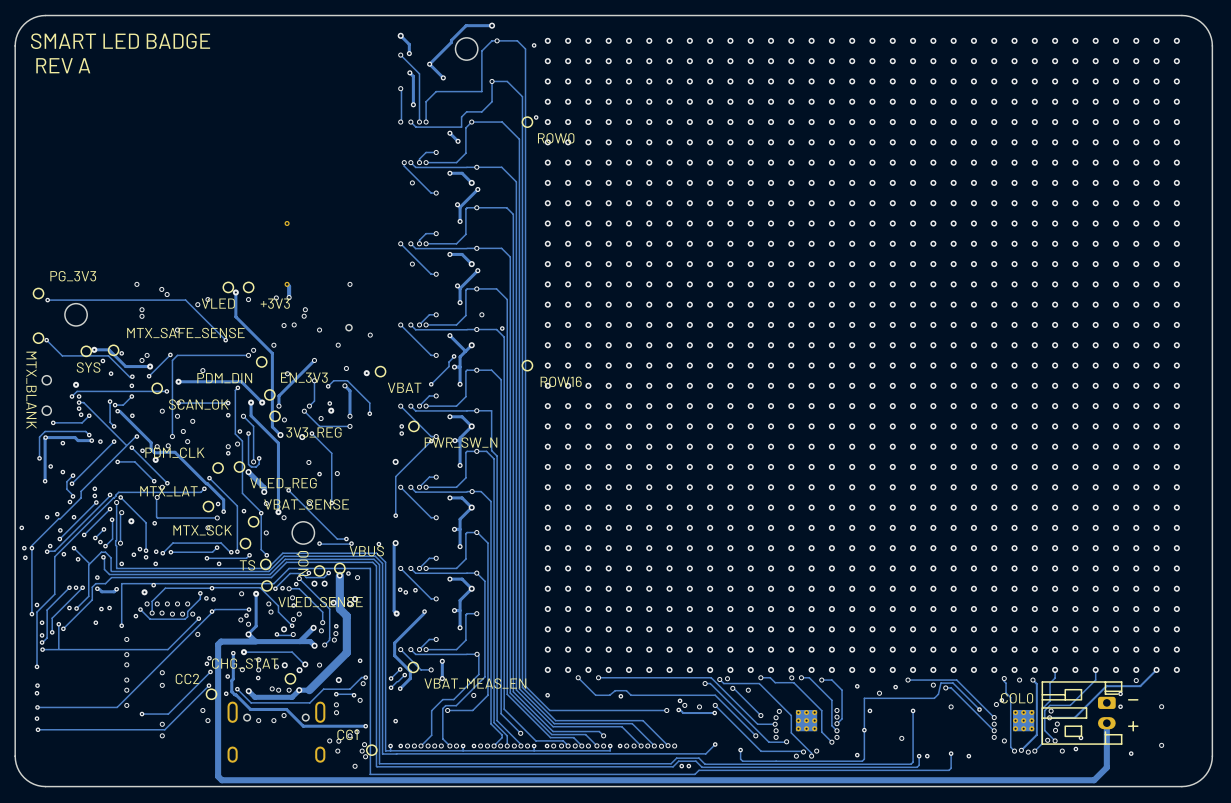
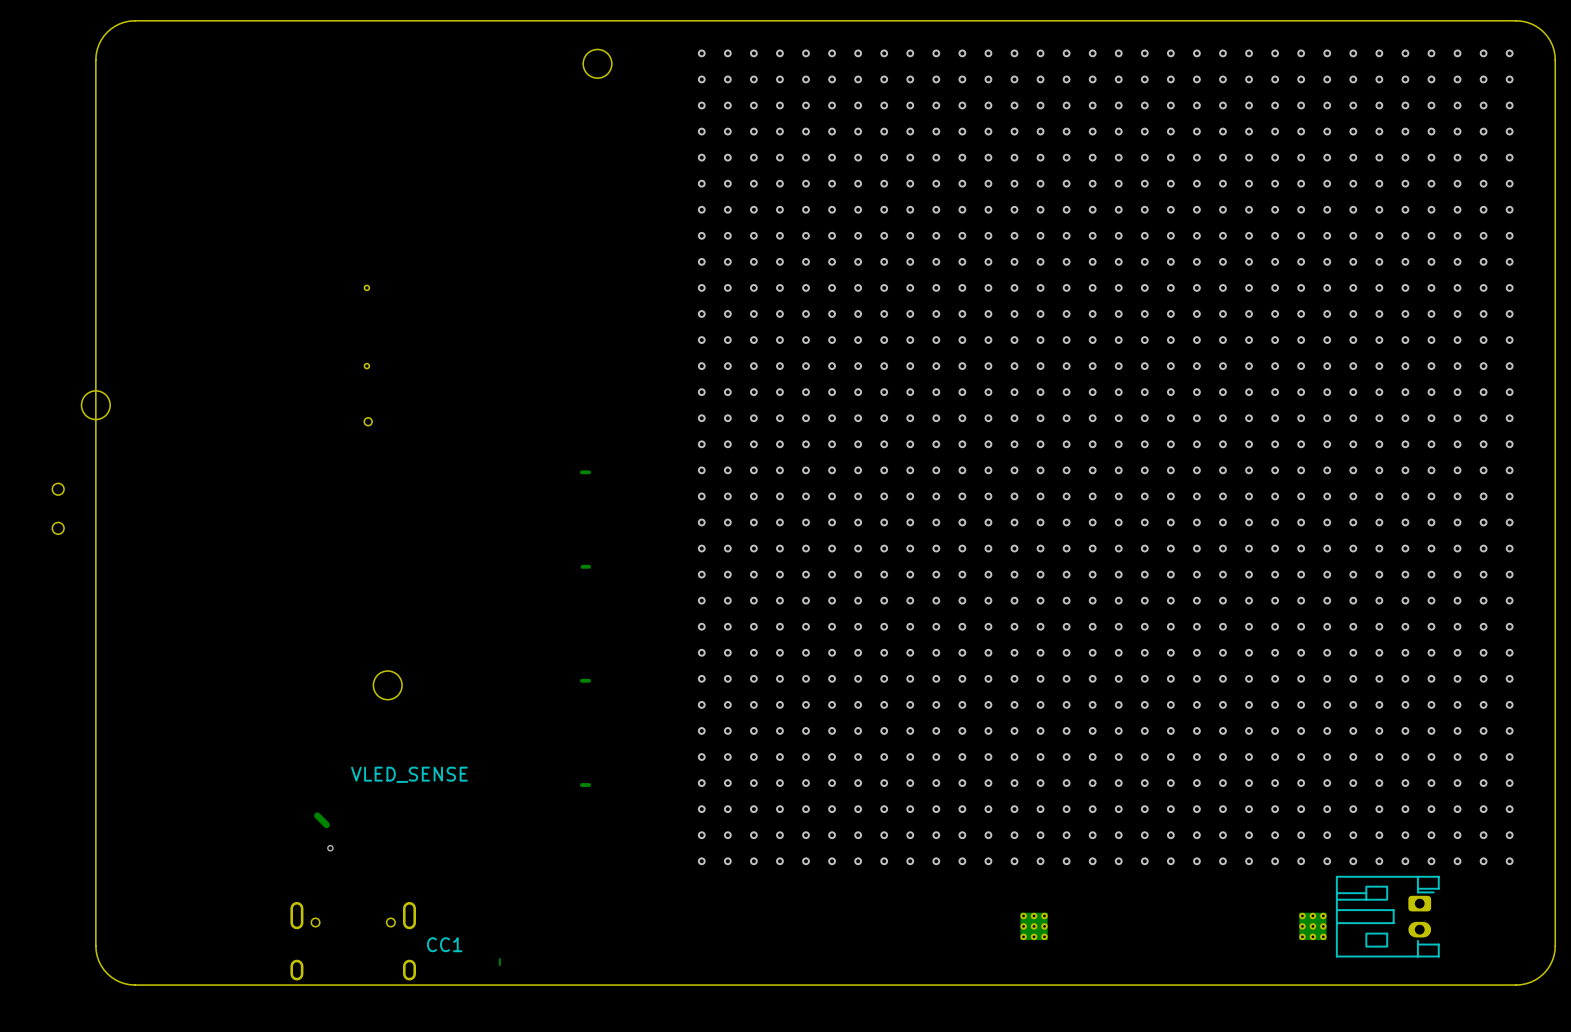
board edge: (106, 15) (37, 16) (30, 19) (21, 27) (15, 41) (15, 756) (19, 771) (30, 782) (45, 786) (1181, 786) (1197, 782) (1208, 771) (1212, 760) (1212, 735) -> (134, 20) (119, 23) (107, 32) (98, 44) (95, 59) (95, 945) (101, 965) (115, 979) (134, 985) (1516, 985) (1531, 982) (1543, 973) (1552, 960) (1555, 945)
track: (492, 25) (466, 25) (451, 40) (429, 64) (443, 77) -> none
via: (492, 25) -> none
track: (400, 35) (409, 44) (409, 53) -> none
via: (400, 35) -> none
via: (497, 40) -> none
text: SMART LED BADGE (120, 41) -> none
via: (534, 45) -> none
via: (409, 53) -> none
track: (400, 55) (419, 73) (419, 122) -> none
via: (400, 55) -> none
via: (429, 64) -> none
text: REV A (63, 65) -> none
track: (409, 72) (413, 76) (413, 104) -> none
via: (409, 72) -> none
via: (443, 77) -> none
via: (492, 81) -> none
via: (400, 88) -> none
track: (401, 89) (401, 121) -> none
via: (413, 104) -> none
drawing: [521, 116, 534, 128] -> none
via: (536, 117) -> none
via: (400, 122) -> none
track: (410, 122) (415, 127) (461, 127) (461, 116) (466, 111) (481, 111) (492, 101) (492, 81) (507, 81) (522, 96) (522, 687) (555, 720) (642, 720) (668, 745) -> none
via: (410, 122) -> none
via: (419, 122) -> none
track: (426, 122) (426, 101) (436, 91) (481, 91) (481, 51) (492, 40) (517, 40) (525, 48) (525, 686) (549, 710) (666, 710) -> none
via: (426, 122) -> none
via: (471, 122) -> none
track: (449, 133) (458, 141) -> none
via: (449, 133) -> none
text: ROW0 (556, 138) -> none
via: (458, 141) -> none
track: (436, 152) (426, 152) (419, 159) (419, 162) -> none
via: (436, 152) -> none
track: (404, 162) (404, 166) (431, 193) (436, 193) -> none
via: (404, 162) -> none
track: (410, 162) (415, 167) (466, 167) -> none
via: (410, 162) -> none
via: (419, 162) -> none
track: (426, 162) (456, 162) (465, 153) (465, 127) (471, 122) (502, 122) (519, 139) (519, 688) (554, 723) (632, 723) (654, 745) -> none
via: (426, 162) -> none
track: (467, 167) (501, 167) (516, 181) (516, 689) (553, 726) (621, 726) (641, 746) -> none
via: (476, 167) -> none
track: (449, 173) (462, 173) (471, 182) -> none
via: (449, 173) -> none
via: (412, 182) -> none
via: (471, 182) -> none
track: (477, 189) (460, 207) -> none
via: (477, 189) -> none
via: (436, 193) -> none
via: (457, 204) -> none
track: (460, 207) (460, 221) -> none
via: (476, 207) -> none
via: (460, 221) -> none
track: (436, 233) (426, 233) (419, 240) (419, 243) -> none
via: (436, 233) -> none
track: (400, 243) (431, 274) (436, 274) -> none
via: (400, 243) -> none
track: (410, 243) (415, 248) (466, 248) -> none
via: (410, 243) -> none
via: (419, 243) -> none
track: (426, 243) (456, 243) (465, 234) (467, 207) (506, 207) (513, 214) (513, 691) (553, 731) (599, 731) (603, 735) -> none
via: (426, 243) -> none
track: (467, 248) (501, 248) (510, 256) (510, 693) (551, 734) (585, 734) (596, 745) -> none
via: (476, 248) -> none
track: (449, 254) (462, 254) (471, 264) -> none
via: (449, 254) -> none
via: (412, 264) -> none
via: (471, 264) -> none
track: (477, 270) (460, 288) -> none
via: (477, 270) -> none
via: (436, 274) -> none
text: PG_3V3 (73, 276) -> none
drawing: [222, 281, 255, 294] -> none
via: (136, 284) -> none
track: (287, 284) (289, 286) (289, 297) -> none
via: (349, 284) -> none
via: (457, 285) -> none
drawing: [32, 287, 45, 300] -> none
track: (460, 288) (460, 302) -> none
via: (476, 288) -> none
via: (161, 289) -> none
track: (235, 292) (235, 316) (272, 353) (272, 426) (278, 433) -> none
via: (235, 292) -> none
via: (167, 294) -> none
via: (276, 297) -> none
via: (289, 297) -> none
via: (207, 299) -> none
via: (248, 299) -> none
track: (47, 300) (185, 300) (225, 340) -> none
via: (47, 300) -> none
via: (460, 302) -> none
text: VLED (218, 303) -> none
text: +3V3 (275, 303) -> none
via: (197, 304) -> none
via: (142, 309) -> none
via: (305, 309) -> none
track: (436, 314) (429, 314) (419, 324) -> none
via: (436, 314) -> none
via: (481, 314) -> none
via: (142, 316) -> none
via: (304, 316) -> none
via: (294, 324) -> none
track: (400, 324) (431, 355) (436, 355) -> none
via: (400, 324) -> none
track: (410, 324) (415, 329) (466, 329) -> none
via: (410, 324) -> none
via: (419, 324) -> none
track: (426, 324) (456, 324) (465, 315) (467, 288) (496, 288) (507, 299) (507, 694) (550, 737) (573, 737) (581, 745) -> none
via: (426, 324) -> none
via: (284, 325) -> none
part position: (348, 327) -> (368, 421)
via: (502, 328) -> none
track: (467, 329) (496, 329) (504, 337) (504, 709) (535, 740) (563, 740) (566, 744) -> none
via: (476, 329) -> none
via: (177, 330) -> none
via: (319, 330) -> none
drawing: [32, 332, 45, 344] -> none
text: MTX_SAFE_SENSE (185, 333) -> none
via: (370, 335) -> none
track: (449, 335) (465, 351) -> none
via: (449, 335) -> none
track: (46, 340) (62, 355) (108, 355) (130, 377) -> none
via: (46, 340) -> none
via: (225, 340) -> none
drawing: [107, 344, 120, 357] -> none
drawing: [80, 345, 93, 358] -> none
via: (273, 345) -> none
via: (338, 345) -> none
track: (471, 345) (460, 356) (460, 384) -> none
via: (471, 345) -> none
track: (94, 349) (109, 349) (125, 366) (150, 366) -> none
via: (94, 349) -> none
via: (253, 350) -> none
via: (121, 353) -> none
track: (170, 354) (149, 376) -> none
via: (170, 354) -> none
via: (147, 355) -> none
track: (248, 355) (177, 355) (172, 360) (172, 436) -> none
via: (248, 355) -> none
via: (436, 355) -> none
drawing: [255, 356, 268, 368] -> none
track: (454, 356) (449, 361) (449, 366) (431, 384) -> none
via: (454, 356) -> none
drawing: [521, 359, 534, 372] -> none
via: (102, 360) -> none
via: (142, 360) -> none
track: (314, 360) (278, 395) (278, 406) -> none
via: (314, 360) -> none
drawing: [374, 365, 387, 378] -> none
via: (150, 366) -> none
text: SYS (88, 367) -> none
via: (454, 367) -> none
via: (346, 368) -> none
via: (202, 370) -> none
via: (476, 370) -> none
via: (111, 373) -> none
via: (287, 373) -> none
via: (366, 373) -> none
via: (132, 376) -> none
via: (149, 376) -> none
text: EN_3V3 (304, 377) -> none
text: PDM_DIN (224, 378) -> none
track: (314, 380) (314, 401) (309, 406) -> none
via: (314, 380) -> none
track: (178, 381) (241, 381) (262, 402) -> none
via: (178, 381) -> none
text: ROW16 (561, 381) -> none
drawing: [151, 382, 164, 395] -> none
via: (76, 384) -> none
via: (431, 384) -> none
via: (460, 384) -> none
via: (131, 385) -> none
track: (344, 385) (349, 390) (349, 416) -> none
via: (344, 385) -> none
track: (328, 386) (333, 380) (347, 380) (369, 403) (369, 413) -> none
via: (328, 386) -> none
track: (237, 387) (235, 390) (235, 434) (242, 441) (242, 493) (260, 511) -> none
via: (237, 387) -> none
text: VBAT (404, 387) -> none
drawing: [264, 389, 281, 423] -> none
text: MTX_BLANK (31, 390) -> none
track: (166, 391) (77, 391) (72, 396) -> none
via: (166, 391) -> none
track: (436, 395) (429, 395) (419, 405) -> none
via: (436, 395) -> none
via: (72, 396) -> none
via: (79, 396) -> none
track: (131, 396) (123, 405) (115, 405) -> none
via: (131, 396) -> none
track: (110, 401) (110, 422) (114, 426) -> none
via: (110, 401) -> none
track: (79, 402) (83, 402) (126, 445) -> none
via: (79, 402) -> none
track: (251, 402) (251, 415) (278, 443) (278, 512) -> none
via: (251, 402) -> none
via: (262, 402) -> none
via: (178, 403) -> none
track: (228, 403) (178, 403) -> none
via: (228, 403) -> none
via: (329, 403) -> none
text: SCAN_OK (198, 404) -> none
via: (115, 405) -> none
via: (278, 406) -> none
via: (309, 406) -> none
track: (400, 406) (431, 436) (436, 436) -> none
via: (400, 406) -> none
track: (410, 406) (415, 410) (466, 410) -> none
via: (410, 406) -> none
via: (419, 406) -> none
track: (426, 406) (456, 406) (465, 396) (467, 370) (491, 370) (501, 379) (501, 713) (520, 733) -> none
via: (426, 406) -> none
via: (79, 408) -> none
via: (331, 410) -> none
track: (467, 410) (491, 410) (491, 450) (497, 456) (497, 720) (520, 746) -> none
via: (476, 410) -> none
via: (117, 411) -> none
track: (119, 411) (151, 442) (151, 449) (154, 452) (174, 452) (223, 499) (223, 511) -> none
via: (162, 411) -> none
track: (304, 411) (319, 426) (349, 426) -> none
via: (304, 411) -> none
via: (369, 413) -> none
via: (81, 414) -> none
track: (89, 415) (82, 422) (53, 422) -> none
via: (89, 415) -> none
via: (132, 415) -> none
via: (228, 415) -> none
via: (177, 416) -> none
track: (243, 416) (253, 426) (253, 461) -> none
via: (243, 416) -> none
via: (349, 416) -> none
track: (449, 416) (462, 416) (471, 426) (460, 438) (460, 465) -> none
via: (449, 416) -> none
via: (321, 418) -> none
via: (284, 419) -> none
drawing: [408, 420, 420, 433] -> none
via: (192, 421) -> none
via: (53, 422) -> none
via: (114, 426) -> none
via: (349, 426) -> none
via: (401, 426) -> none
via: (471, 426) -> none
via: (183, 431) -> none
via: (239, 431) -> none
text: 3V3_REG (314, 432) -> none
track: (248, 433) (248, 464) (256, 466) (259, 463) (259, 458) -> none
via: (248, 433) -> none
track: (311, 433) (331, 453) (331, 503) -> none
via: (311, 433) -> none
via: (401, 433) -> none
track: (89, 435) (85, 431) (45, 431) (39, 437) (39, 458) -> none
via: (89, 435) -> none
via: (280, 435) -> none
track: (136, 436) (81, 491) (81, 497) (31, 546) -> none
via: (136, 436) -> none
via: (172, 436) -> none
via: (436, 436) -> none
track: (45, 437) (75, 437) (78, 440) (90, 440) -> none
via: (45, 437) -> none
via: (302, 437) -> none
track: (44, 438) (45, 481) -> none
via: (91, 440) -> none
via: (455, 440) -> none
via: (100, 441) -> none
track: (114, 441) (72, 483) -> none
via: (114, 441) -> none
via: (187, 441) -> none
track: (431, 441) (395, 476) (395, 515) -> none
via: (431, 441) -> none
text: PWR_SW_N (461, 442) -> none
via: (62, 443) -> none
via: (237, 444) -> none
via: (168, 445) -> none
via: (157, 446) -> none
via: (228, 446) -> none
track: (131, 447) (167, 483) -> none
via: (131, 447) -> none
via: (142, 450) -> none
via: (476, 451) -> none
text: PDM_CLK (174, 452) -> none
via: (228, 453) -> none
via: (39, 458) -> none
via: (259, 458) -> none
via: (155, 459) -> none
track: (117, 461) (134, 461) (154, 481) -> none
via: (117, 461) -> none
drawing: [212, 461, 246, 474] -> none
via: (253, 461) -> none
via: (395, 461) -> none
via: (308, 462) -> none
via: (460, 465) -> none
via: (50, 466) -> none
via: (62, 472) -> none
track: (248, 472) (264, 487) (264, 491) -> none
via: (248, 472) -> none
via: (337, 473) -> none
via: (319, 474) -> none
track: (73, 475) (66, 481) (66, 489) (72, 494) -> none
via: (73, 475) -> none
track: (436, 477) (429, 477) (419, 487) -> none
via: (436, 477) -> none
track: (209, 478) (237, 506) (237, 551) -> none
via: (209, 478) -> none
via: (45, 481) -> none
via: (154, 481) -> none
via: (72, 483) -> none
via: (167, 483) -> none
text: VLED_REG (283, 483) -> none
via: (162, 487) -> none
track: (400, 487) (431, 517) (436, 517) -> none
via: (400, 487) -> none
track: (410, 487) (415, 492) (466, 492) -> none
via: (410, 487) -> none
via: (419, 487) -> none
track: (426, 487) (456, 487) (465, 477) (467, 451) (486, 451) (494, 458) (494, 722) (507, 735) (507, 746) -> none
via: (426, 487) -> none
via: (94, 488) -> none
track: (204, 488) (200, 492) (118, 492) (54, 556) (54, 594) (37, 612) (37, 666) -> none
via: (204, 488) -> none
track: (288, 490) (337, 539) (346, 539) -> none
via: (288, 490) -> none
text: MTX_LAT (168, 491) -> none
via: (264, 491) -> none
track: (467, 491) (481, 491) (491, 501) (491, 723) (502, 735) (495, 744) -> none
via: (472, 491) -> none
track: (110, 494) (54, 551) (49, 551) -> none
via: (110, 494) -> none
via: (94, 495) -> none
via: (73, 496) -> none
track: (120, 497) (146, 522) (146, 550) -> none
via: (120, 497) -> none
track: (157, 497) (157, 517) (217, 517) -> none
via: (157, 497) -> none
track: (449, 497) (462, 497) (471, 507) (460, 519) (460, 546) -> none
via: (449, 497) -> none
drawing: [202, 500, 215, 513] -> none
via: (69, 502) -> none
track: (96, 502) (59, 539) -> none
via: (96, 502) -> none
track: (116, 502) (116, 568) (267, 568) (282, 553) (376, 553) (385, 562) (385, 750) (610, 750) (610, 746) -> none
via: (116, 502) -> none
via: (266, 503) -> none
via: (309, 503) -> none
via: (331, 503) -> none
via: (218, 504) -> none
text: VBAT_SENSE (306, 504) -> none
via: (471, 507) -> none
track: (110, 509) (84, 534) -> none
via: (110, 509) -> none
via: (223, 511) -> none
via: (243, 511) -> none
track: (121, 512) (120, 543) -> none
via: (121, 512) -> none
via: (278, 512) -> none
track: (261, 513) (261, 549) (266, 555) -> none
via: (261, 513) -> none
via: (57, 514) -> none
drawing: [239, 515, 260, 550] -> none
via: (395, 515) -> none
via: (47, 517) -> none
via: (74, 517) -> none
via: (217, 517) -> none
via: (284, 517) -> none
via: (436, 517) -> none
track: (112, 519) (112, 539) (105, 546) -> none
via: (112, 519) -> none
via: (131, 521) -> none
via: (154, 523) -> none
via: (21, 527) -> none
via: (207, 527) -> none
track: (103, 529) (95, 538) -> none
via: (103, 529) -> none
via: (454, 529) -> none
via: (60, 530) -> none
text: MTX_SCK (202, 530) -> none
via: (266, 532) -> none
track: (476, 532) (465, 533) (465, 559) (456, 568) (426, 568) -> none
via: (476, 532) -> none
track: (477, 532) (487, 543) (487, 695) (472, 710) (447, 710) -> none
via: (84, 534) -> none
via: (95, 538) -> none
via: (59, 539) -> none
via: (346, 539) -> none
via: (100, 542) -> none
via: (120, 543) -> none
via: (319, 543) -> none
track: (351, 543) (319, 543) -> none
via: (351, 543) -> none
via: (395, 543) -> none
via: (378, 544) -> none
track: (394, 545) (394, 611) (396, 613) -> none
via: (50, 546) -> none
via: (105, 546) -> none
via: (460, 546) -> none
track: (217, 547) (212, 552) (170, 552) -> none
via: (217, 547) -> none
via: (24, 548) -> none
track: (31, 548) (31, 614) -> none
via: (31, 548) -> none
track: (74, 548) (89, 563) -> none
via: (74, 548) -> none
via: (139, 549) -> none
via: (146, 550) -> none
via: (47, 551) -> none
via: (156, 551) -> none
track: (229, 551) (221, 543) (172, 543) (162, 553) -> none
via: (237, 551) -> none
text: VBUS (366, 551) -> none
via: (170, 552) -> none
via: (231, 552) -> none
via: (162, 553) -> none
via: (63, 554) -> none
via: (133, 554) -> none
track: (249, 555) (246, 558) (206, 558) -> none
via: (249, 555) -> none
via: (266, 555) -> none
via: (25, 557) -> none
track: (103, 557) (104, 569) (111, 574) -> none
via: (103, 557) -> none
via: (146, 557) -> none
via: (206, 558) -> none
drawing: [259, 558, 273, 592] -> none
track: (436, 558) (429, 558) (419, 568) -> none
via: (436, 558) -> none
via: (78, 559) -> none
drawing: [313, 562, 346, 577] -> none
via: (121, 563) -> none
via: (155, 563) -> none
via: (219, 563) -> none
text: QON (302, 563) -> none
text: TS (247, 565) -> none
track: (370, 568) (289, 568) (273, 583) (121, 583) -> none
track: (370, 568) (370, 774) -> none
track: (400, 568) (431, 598) (436, 598) -> none
via: (400, 568) -> none
track: (410, 568) (415, 573) (466, 573) -> none
via: (410, 568) -> none
via: (419, 568) -> none
via: (426, 568) -> none
track: (111, 570) (111, 557) (105, 552) (101, 552) (88, 564) (88, 596) (76, 608) -> none
track: (111, 571) (268, 571) (284, 556) (375, 556) (382, 563) (382, 754) (705, 753) (715, 744) -> none
via: (308, 573) -> none
track: (328, 573) (324, 577) (306, 577) (302, 573) (290, 573) (275, 588) -> none
via: (328, 573) -> none
via: (348, 573) -> none
track: (467, 573) (476, 573) (484, 581) (484, 677) (456, 705) (445, 705) (442, 708) (442, 738) (449, 746) -> none
via: (476, 573) -> none
track: (111, 574) (270, 574) (285, 559) (374, 559) (379, 564) (379, 763) (671, 763) (676, 758) (699, 758) (705, 764) (911, 764) (913, 762) (913, 710) -> none
track: (339, 575) (339, 609) (346, 616) (346, 652) (309, 690) (299, 690) (292, 697) (254, 697) (248, 691) -> none
via: (339, 575) -> none
via: (97, 577) -> none
track: (111, 577) (271, 577) (286, 562) (372, 562) (376, 566) (376, 766) (673, 766) (678, 761) (695, 761) (702, 767) (917, 767) (919, 765) (919, 756) -> none
via: (357, 577) -> none
track: (111, 578) (105, 583) (95, 583) (92, 587) (92, 599) (63, 628) -> none
track: (299, 578) (329, 609) (329, 640) (324, 645) -> none
via: (299, 578) -> none
track: (449, 579) (462, 579) (471, 588) (460, 600) (460, 627) -> none
via: (449, 579) -> none
via: (314, 583) -> none
via: (324, 583) -> none
track: (121, 584) (121, 625) -> none
via: (296, 584) -> none
via: (153, 585) -> none
track: (69, 587) (47, 610) (47, 637) (42, 642) -> none
via: (69, 587) -> none
via: (76, 587) -> none
track: (82, 587) (52, 618) (52, 632) -> none
via: (82, 587) -> none
track: (214, 587) (260, 587) (278, 605) (278, 612) (292, 625) -> none
via: (97, 588) -> none
track: (212, 588) (165, 588) (152, 601) (152, 610) -> none
via: (212, 588) -> none
via: (275, 588) -> none
via: (282, 588) -> none
track: (289, 588) (299, 588) (322, 612) (322, 622) -> none
via: (289, 588) -> none
via: (471, 588) -> none
track: (116, 589) (114, 591) (101, 591) (99, 589) -> none
via: (116, 589) -> none
via: (400, 589) -> none
via: (415, 590) -> none
via: (144, 592) -> none
via: (405, 592) -> none
track: (200, 593) (200, 598) (187, 611) (187, 616) (185, 619) (150, 619) (140, 609) -> none
via: (200, 593) -> none
via: (241, 593) -> none
track: (256, 593) (256, 626) (250, 632) -> none
via: (256, 593) -> none
via: (292, 597) -> none
via: (206, 598) -> none
via: (436, 598) -> none
via: (213, 599) -> none
via: (355, 599) -> none
via: (333, 602) -> none
via: (147, 603) -> none
via: (157, 603) -> none
via: (167, 603) -> none
via: (177, 603) -> none
via: (187, 603) -> none
via: (268, 603) -> none
via: (349, 603) -> none
via: (37, 604) -> none
via: (293, 605) -> none
via: (69, 608) -> none
via: (76, 608) -> none
via: (109, 608) -> none
via: (101, 609) -> none
via: (140, 609) -> none
track: (249, 609) (215, 609) (117, 707) (37, 707) -> none
via: (249, 609) -> none
via: (454, 610) -> none
via: (212, 611) -> none
via: (424, 611) -> none
via: (271, 612) -> none
via: (152, 613) -> none
via: (162, 613) -> none
via: (396, 613) -> none
track: (424, 613) (394, 643) (394, 655) (410, 671) (410, 678) (401, 687) -> none
track: (476, 613) (465, 614) (465, 640) (456, 649) (426, 649) -> none
via: (476, 613) -> none
via: (31, 614) -> none
via: (172, 614) -> none
via: (182, 614) -> none
via: (192, 614) -> none
via: (299, 614) -> none
via: (246, 615) -> none
via: (135, 616) -> none
track: (198, 618) (167, 649) (42, 649) -> none
via: (198, 618) -> none
via: (240, 619) -> none
via: (293, 619) -> none
via: (42, 622) -> none
via: (95, 622) -> none
via: (322, 622) -> none
track: (58, 624) (58, 649) -> none
via: (58, 624) -> none
via: (248, 624) -> none
via: (121, 625) -> none
via: (292, 625) -> none
via: (336, 626) -> none
track: (313, 627) (299, 641) -> none
via: (313, 627) -> none
via: (460, 627) -> none
via: (63, 628) -> none
via: (284, 629) -> none
via: (321, 630) -> none
via: (52, 632) -> none
via: (335, 633) -> none
via: (197, 634) -> none
via: (248, 634) -> none
track: (276, 634) (291, 635) -> none
via: (276, 634) -> none
via: (293, 634) -> none
via: (42, 635) -> none
via: (126, 639) -> none
track: (436, 639) (429, 639) (419, 649) -> none
via: (436, 639) -> none
via: (334, 640) -> none
via: (42, 642) -> none
track: (314, 645) (310, 641) (221, 641) (218, 644) (218, 776) (221, 780) (1094, 780) (1106, 767) (1106, 723) -> none
via: (314, 645) -> none
via: (324, 645) -> none
via: (42, 649) -> none
track: (400, 649) (421, 669) (431, 669) -> none
via: (400, 649) -> none
track: (410, 649) (415, 654) (466, 654) -> none
via: (410, 649) -> none
via: (419, 649) -> none
via: (426, 649) -> none
track: (243, 652) (292, 652) (303, 663) -> none
via: (243, 652) -> none
track: (233, 653) (231, 691) (250, 709) (286, 709) (303, 726) (365, 726) -> none
via: (233, 653) -> none
via: (126, 654) -> none
track: (477, 654) (467, 654) -> none
via: (477, 654) -> none
track: (478, 654) (478, 674) (453, 699) (442, 699) (431, 710) (431, 735) (421, 746) -> none
via: (209, 658) -> none
via: (360, 660) -> none
drawing: [407, 661, 420, 674] -> none
track: (442, 661) (442, 678) -> none
via: (442, 661) -> none
via: (206, 663) -> none
text: CHG_STAT (245, 663) -> none
via: (126, 664) -> none
via: (305, 664) -> none
via: (284, 665) -> none
via: (319, 665) -> none
via: (37, 666) -> none
via: (276, 666) -> none
via: (242, 669) -> none
via: (258, 669) -> none
track: (400, 669) (391, 678) -> none
via: (400, 669) -> none
via: (431, 669) -> none
track: (1055, 669) (1055, 678) (1050, 683) (1050, 701) (1041, 709) (1041, 744) (1034, 751) -> none
track: (1095, 669) (1095, 680) (1070, 705) (1049, 705) (1044, 710) (1044, 730) (1055, 740) -> none
track: (1156, 669) (1140, 686) (1106, 686) (1074, 717) (1049, 717) -> none
via: (299, 670) -> none
track: (210, 671) (168, 714) (142, 714) -> none
via: (210, 671) -> none
via: (162, 672) -> none
drawing: [284, 673, 297, 685] -> none
track: (404, 675) (398, 681) -> none
via: (404, 675) -> none
via: (227, 676) -> none
track: (365, 677) (361, 677) (349, 689) (323, 689) (309, 702) (251, 702) (237, 689) -> none
via: (365, 677) -> none
track: (578, 677) (595, 695) (609, 695) (615, 690) (626, 690) (631, 695) (715, 695) (755, 735) -> none
via: (578, 677) -> none
track: (598, 677) (711, 677) (757, 724) (775, 724) -> none
via: (598, 677) -> none
track: (760, 677) (770, 677) (775, 682) (793, 682) (821, 710) (821, 732) (831, 742) -> none
via: (760, 677) -> none
via: (791, 677) -> none
track: (801, 677) (809, 677) (831, 700) (831, 725) (836, 730) -> none
via: (801, 677) -> none
text: CC2 (187, 678) -> none
via: (258, 678) -> none
via: (391, 678) -> none
via: (442, 678) -> none
via: (727, 678) -> none
track: (1004, 678) (1006, 692) (1010, 697) (1010, 747) (1014, 751) -> none
via: (1004, 678) -> none
track: (719, 679) (723, 683) (759, 683) (791, 715) (791, 732) (811, 753) (811, 756) -> none
via: (719, 679) -> none
via: (126, 680) -> none
via: (338, 680) -> none
track: (821, 680) (831, 680) (842, 690) (842, 718) (837, 723) -> none
via: (821, 680) -> none
track: (908, 680) (956, 680) (994, 717) -> none
via: (908, 680) -> none
via: (1019, 680) -> none
track: (1032, 680) (1036, 683) (1036, 734) (1021, 750) -> none
via: (1032, 680) -> none
via: (1136, 680) -> none
track: (397, 681) (391, 687) -> none
via: (363, 683) -> none
text: VBAT_MEAS_EN (475, 683) -> none
track: (705, 683) (710, 683) (768, 742) (786, 742) -> none
via: (705, 683) -> none
via: (37, 685) -> none
via: (162, 685) -> none
track: (208, 685) (164, 729) (38, 729) -> none
via: (208, 685) -> none
via: (933, 685) -> none
via: (857, 686) -> none
via: (391, 687) -> none
via: (895, 687) -> none
track: (945, 687) (951, 687) (994, 730) -> none
via: (945, 687) -> none
drawing: [205, 688, 218, 701] -> none
via: (272, 688) -> none
via: (400, 688) -> none
via: (732, 688) -> none
track: (733, 688) (760, 715) -> none
via: (237, 689) -> none
via: (126, 690) -> none
via: (278, 690) -> none
via: (289, 690) -> none
via: (299, 690) -> none
via: (748, 690) -> none
via: (248, 691) -> none
via: (37, 693) -> none
via: (226, 693) -> none
via: (879, 693) -> none
via: (1120, 693) -> none
track: (336, 694) (354, 695) -> none
via: (336, 694) -> none
via: (354, 695) -> none
via: (473, 695) -> none
via: (547, 695) -> none
via: (620, 696) -> none
text: COL0 (1017, 698) -> none
line: (1137, 699) (1128, 699) -> none
via: (360, 700) -> none
via: (680, 700) -> none
via: (1001, 700) -> none
via: (336, 704) -> none
via: (996, 704) -> none
via: (126, 705) -> none
via: (684, 705) -> none
track: (715, 705) (761, 751) (802, 751) -> none
via: (715, 705) -> none
via: (699, 706) -> none
via: (951, 706) -> none
via: (1120, 706) -> none
via: (1161, 706) -> none
via: (37, 707) -> none
via: (678, 709) -> none
track: (680, 709) (683, 713) (714, 713) -> none
track: (979, 709) (953, 683) (940, 683) (938, 694) (934, 698) (864, 698) (864, 759) (862, 761) (742, 761) (740, 759) (740, 750) -> none
via: (979, 709) -> none
via: (202, 710) -> none
via: (447, 710) -> none
via: (666, 710) -> none
via: (836, 710) -> none
via: (869, 710) -> none
via: (913, 710) -> none
via: (779, 711) -> none
via: (1051, 711) -> none
via: (336, 712) -> none
via: (714, 713) -> none
via: (142, 714) -> none
via: (284, 715) -> none
via: (760, 715) -> none
via: (776, 717) -> none
via: (837, 717) -> none
via: (994, 717) -> none
via: (1049, 717) -> none
via: (37, 718) -> none
via: (207, 720) -> none
via: (258, 720) -> none
via: (273, 720) -> none
via: (395, 721) -> none
line: (1133, 721) (1133, 730) -> none
via: (836, 723) -> none
via: (162, 724) -> none
via: (775, 724) -> none
via: (994, 724) -> none
via: (1057, 724) -> none
via: (365, 726) -> none
line: (1137, 726) (1128, 726) -> none
via: (38, 729) -> none
via: (776, 730) -> none
via: (836, 730) -> none
via: (864, 730) -> none
via: (994, 730) -> none
via: (1055, 730) -> none
via: (356, 731) -> none
via: (520, 733) -> none
via: (162, 735) -> none
via: (349, 735) -> none
via: (603, 735) -> none
via: (755, 735) -> none
via: (776, 737) -> none
via: (836, 737) -> none
via: (994, 737) -> none
via: (1080, 737) -> none
via: (901, 738) -> none
via: (329, 740) -> none
via: (1004, 740) -> none
via: (1047, 740) -> none
via: (1055, 740) -> none
via: (338, 741) -> none
via: (786, 741) -> none
via: (831, 742) -> none
via: (364, 744) -> none
drawing: [365, 744, 378, 756] -> none
via: (715, 744) -> none
via: (596, 745) -> none
via: (668, 745) -> none
via: (1161, 745) -> none
via: (390, 746) -> none
via: (400, 746) -> none
via: (407, 746) -> none
via: (414, 746) -> none
via: (421, 746) -> none
via: (428, 746) -> none
via: (434, 746) -> none
via: (441, 746) -> none
via: (449, 746) -> none
via: (456, 746) -> none
track: (463, 746) (463, 750) -> none
via: (463, 746) -> none
via: (474, 746) -> none
via: (480, 746) -> none
via: (487, 746) -> none
via: (494, 746) -> none
via: (500, 746) -> none
via: (507, 746) -> none
via: (514, 746) -> none
via: (520, 746) -> none
via: (527, 746) -> none
track: (534, 746) (534, 750) -> none
via: (534, 746) -> none
via: (547, 746) -> none
via: (553, 746) -> none
via: (561, 746) -> none
via: (568, 746) -> none
via: (575, 746) -> none
via: (581, 746) -> none
via: (588, 746) -> none
via: (603, 746) -> none
via: (610, 746) -> none
via: (620, 746) -> none
via: (626, 746) -> none
via: (634, 746) -> none
via: (641, 746) -> none
via: (647, 746) -> none
via: (654, 746) -> none
via: (661, 746) -> none
via: (674, 746) -> none
via: (1075, 749) -> none
via: (740, 750) -> none
via: (1021, 750) -> none
via: (337, 751) -> none
via: (362, 751) -> none
via: (803, 751) -> none
via: (816, 751) -> none
via: (1014, 751) -> none
via: (1034, 751) -> none
via: (1062, 751) -> none
via: (1028, 752) -> none
track: (951, 753) (951, 768) (949, 770) (699, 770) (694, 774) (370, 774) -> none
via: (951, 753) -> none
via: (1131, 753) -> none
via: (857, 755) -> none
via: (365, 756) -> none
via: (796, 756) -> none
via: (811, 756) -> none
via: (919, 756) -> none
via: (927, 756) -> none
via: (968, 756) -> none
via: (355, 766) -> none
via: (681, 766) -> none
via: (688, 766) -> none

